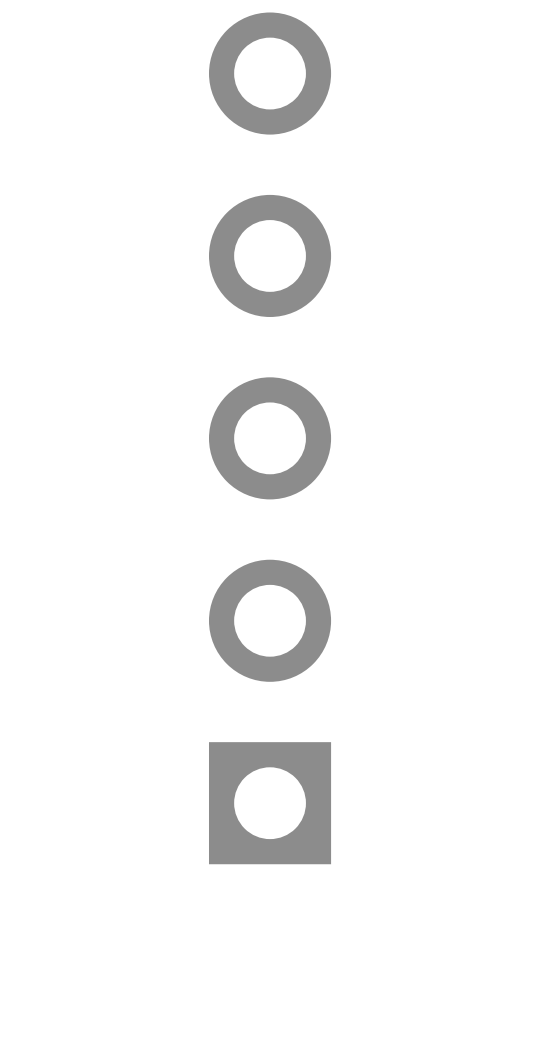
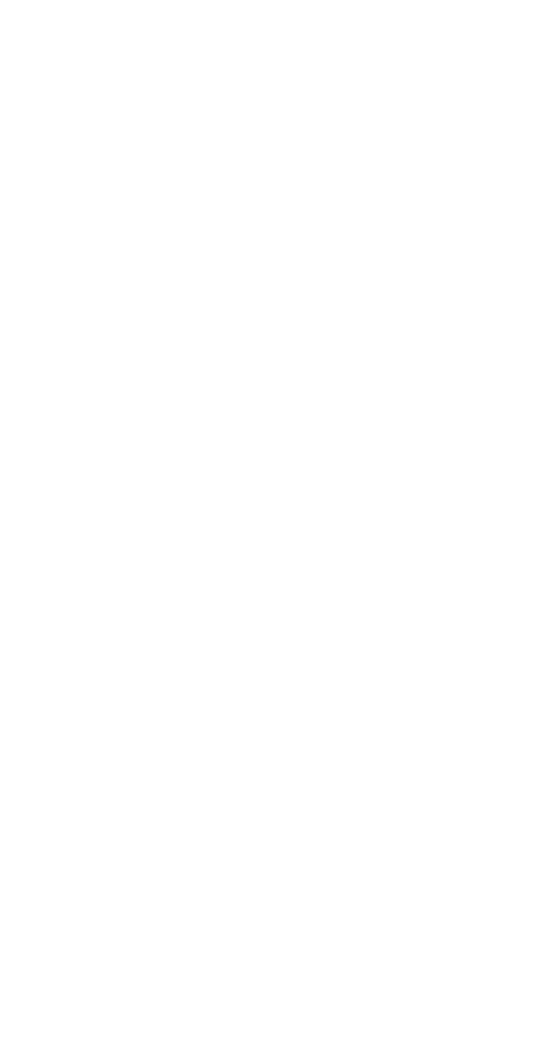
part: (270, 438) -> none

